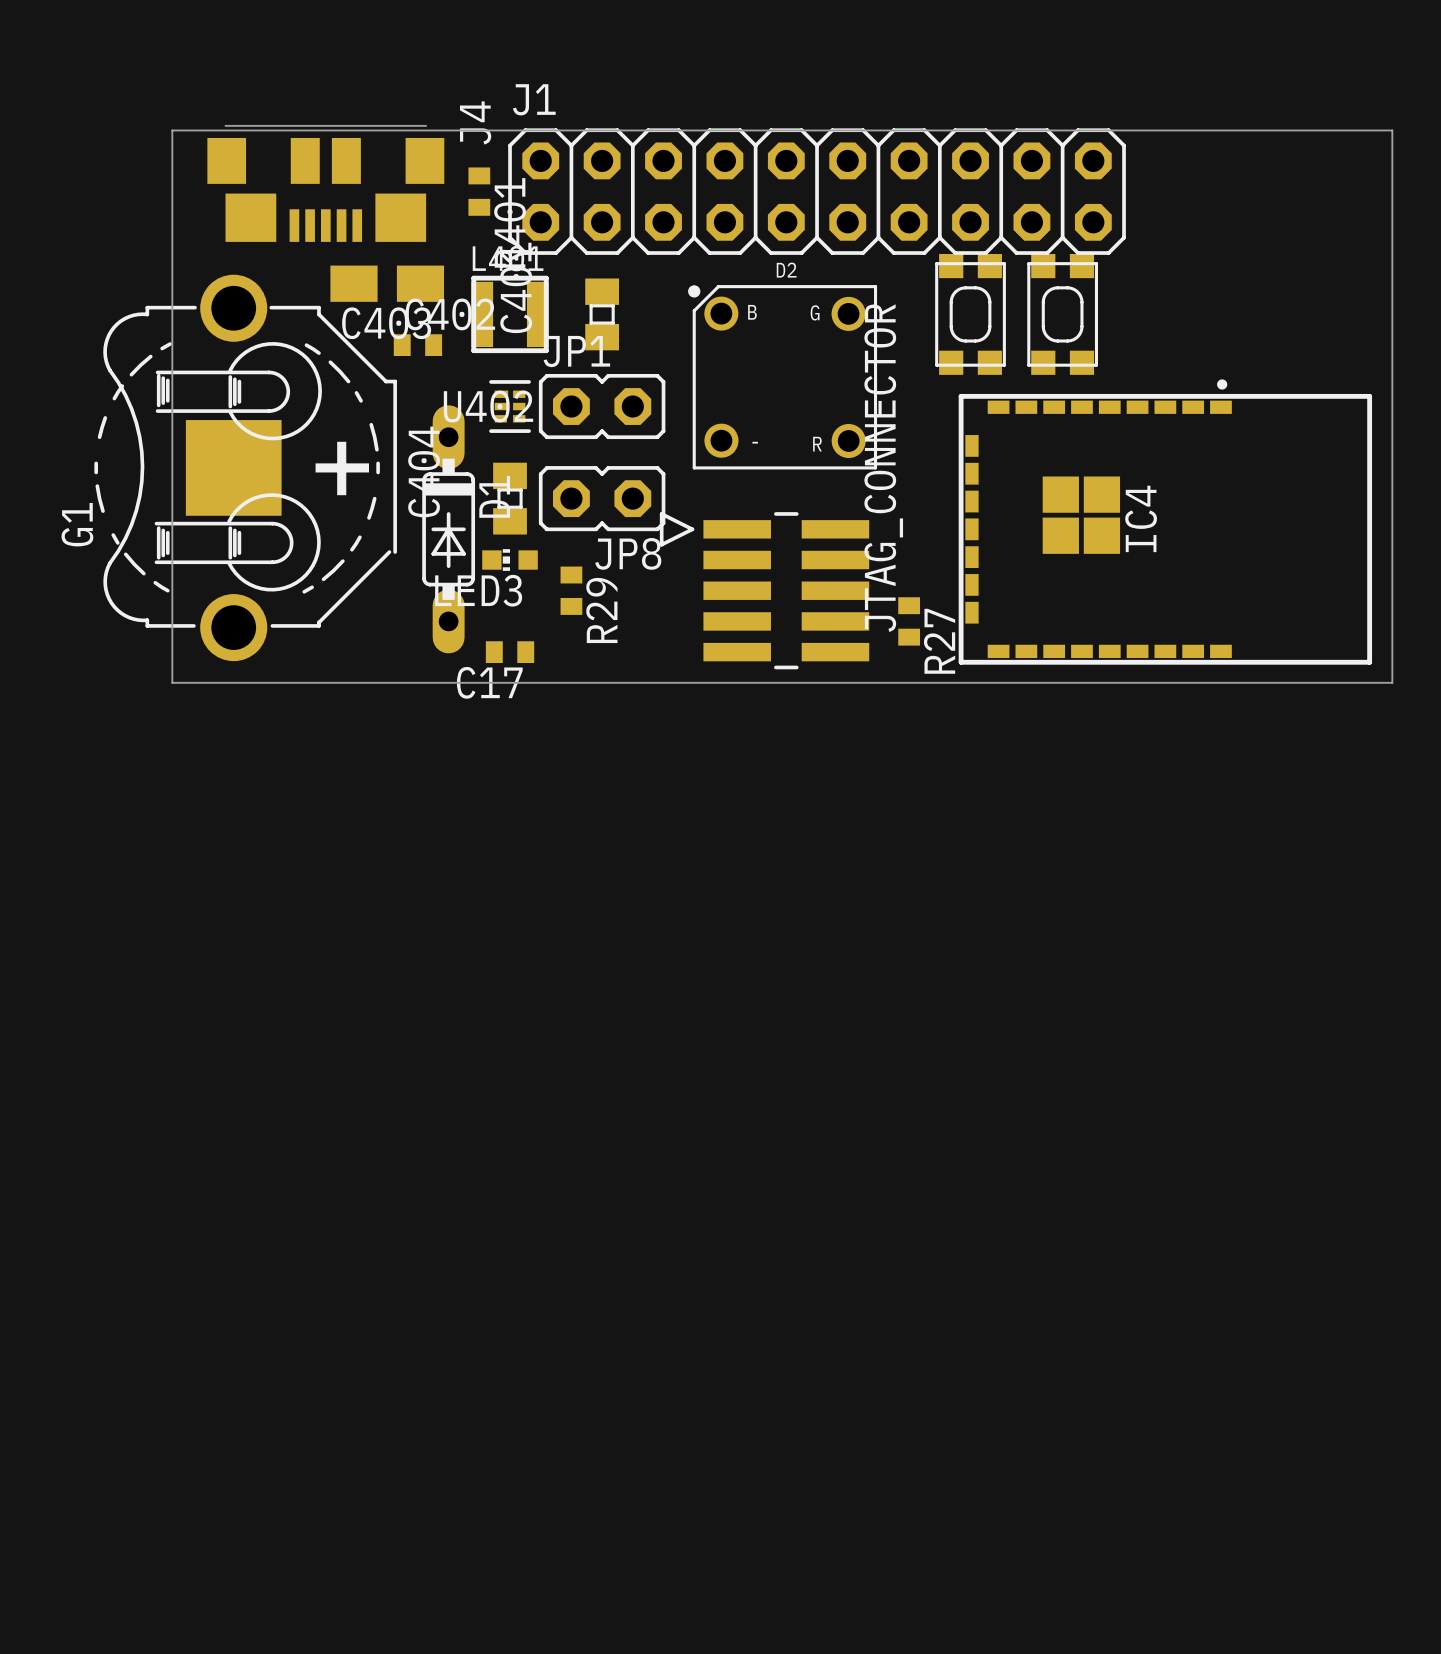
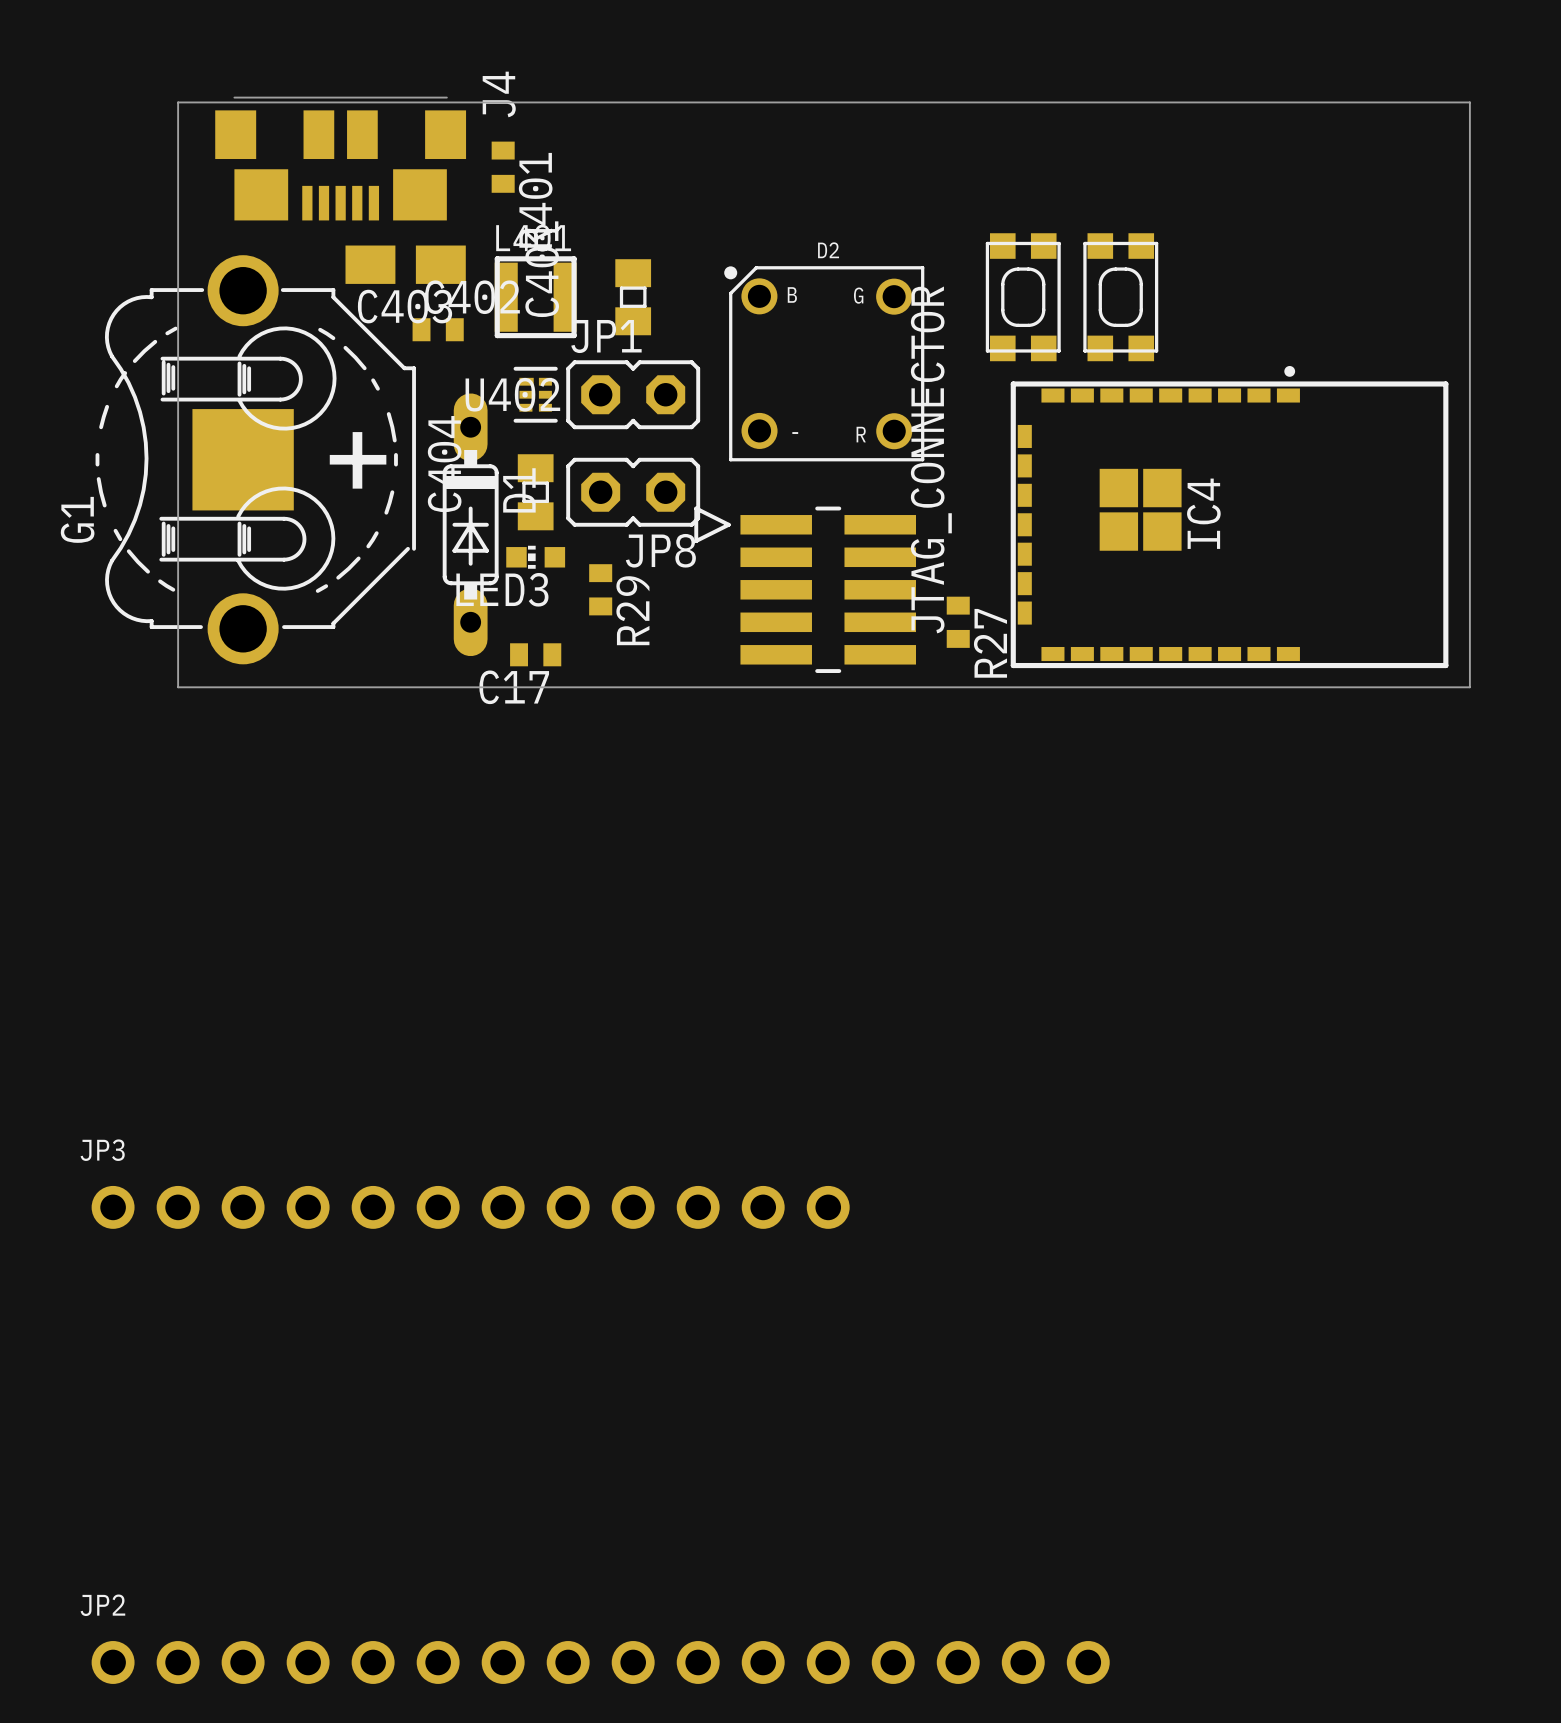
J1: (817, 191) -> none
JP3: none -> (470, 1207)
JP2: none -> (600, 1662)

